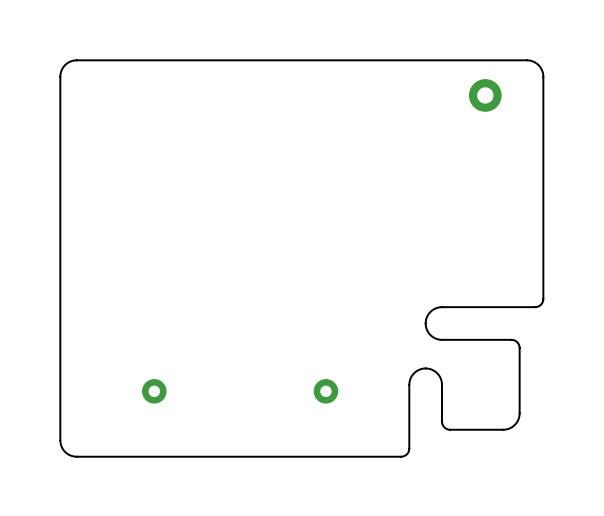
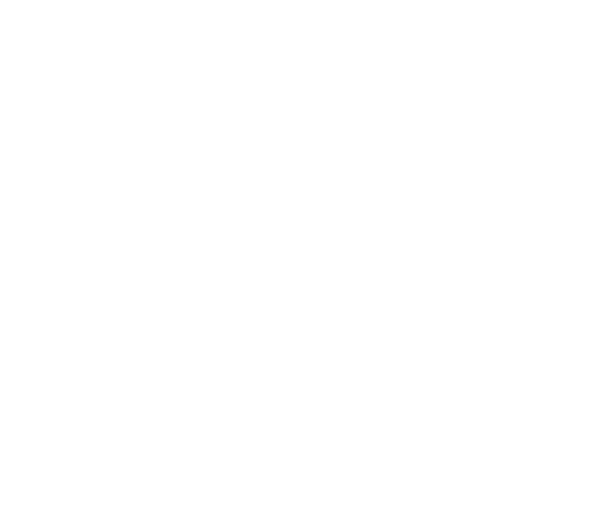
board edge: (527, 60) (76, 60) (66, 63) (62, 68) (60, 76) (60, 440) (63, 450) (68, 454) (76, 456) (403, 456) (409, 449) (409, 380) (415, 371) (425, 368) (435, 371) (441, 380) (442, 422) (446, 428) (503, 429) (513, 426) (517, 421) (519, 413) (519, 348) (517, 343) (511, 339) (437, 339) (429, 333) (425, 323) (429, 313) (439, 307) (535, 307) (542, 302) (543, 76) (538, 65) (527, 60) -> none
part: (485, 95) -> none
part: (154, 391) -> none
part: (325, 391) -> none

